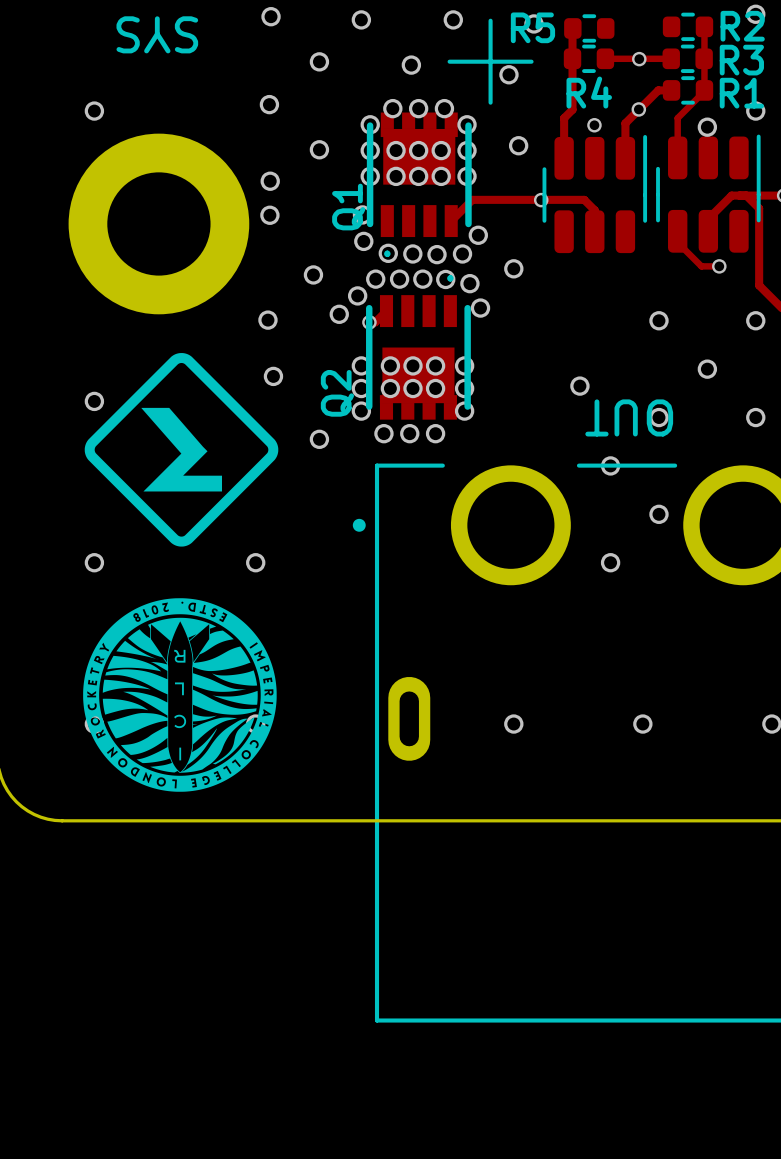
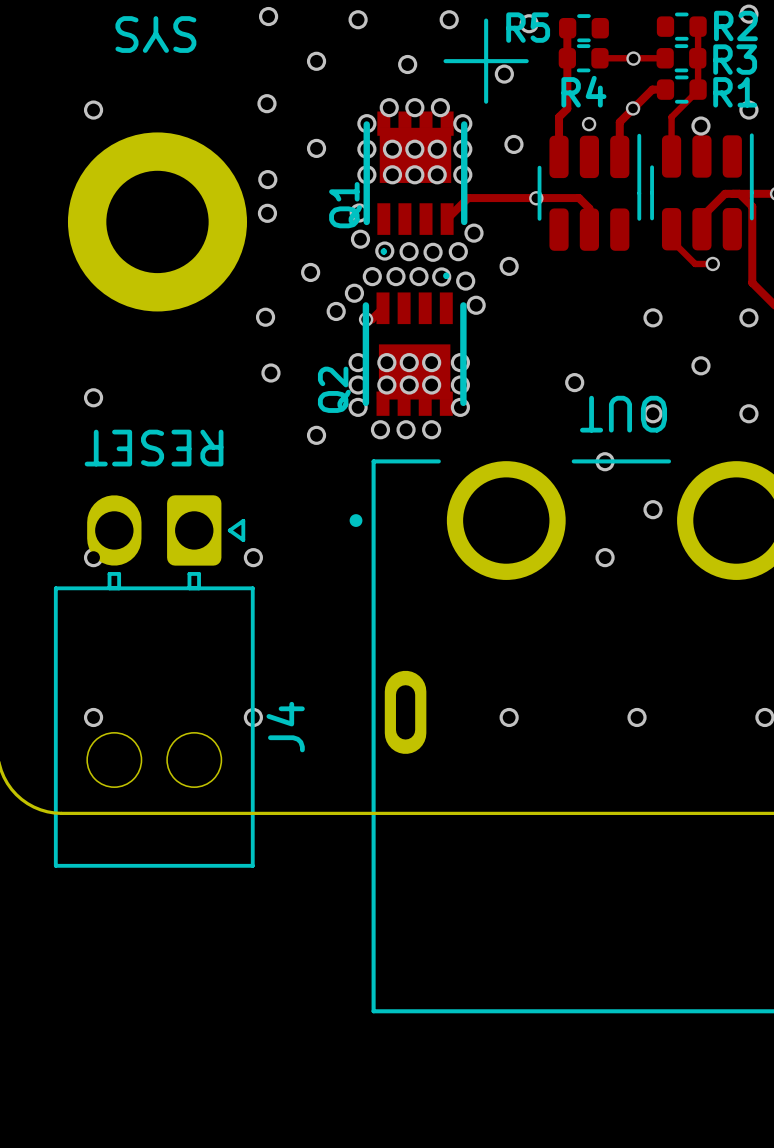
drawing: [84, 353, 279, 547] -> none
text: none -> RESET (154, 448)
drawing: [83, 598, 277, 792] -> none
J4: none -> (154, 681)

